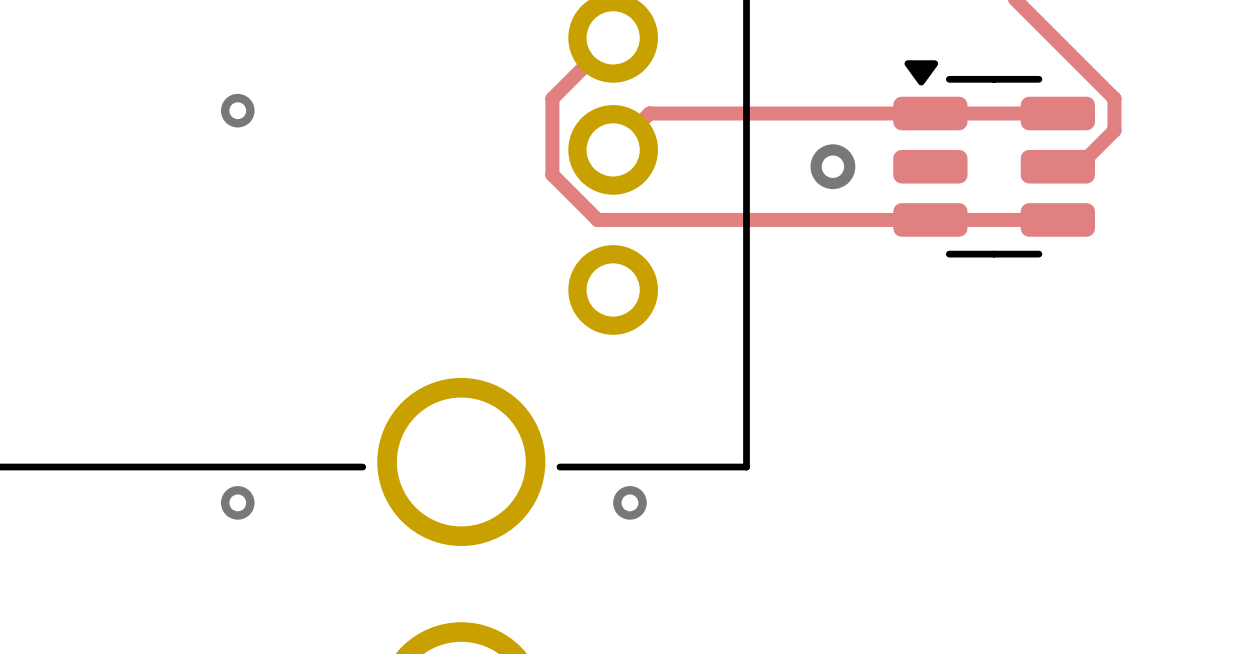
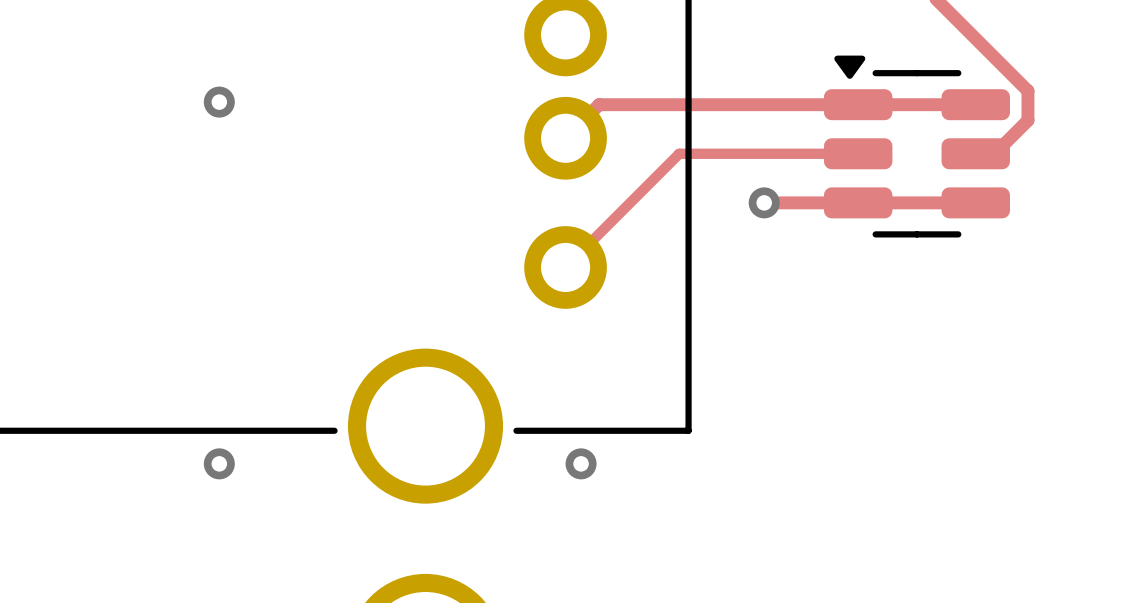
track: (613, 37) (552, 98) (552, 174) (597, 219) (828, 219) -> none
via: (832, 166) -> none
track: none -> (858, 153) (679, 153) (565, 267)
via: none -> (764, 202)

